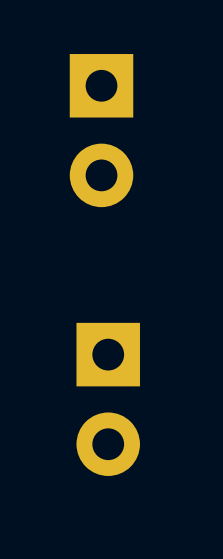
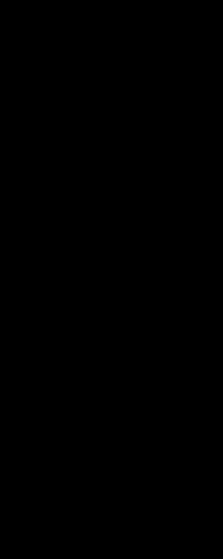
part: (101, 130) -> none
part: (108, 399) -> none

